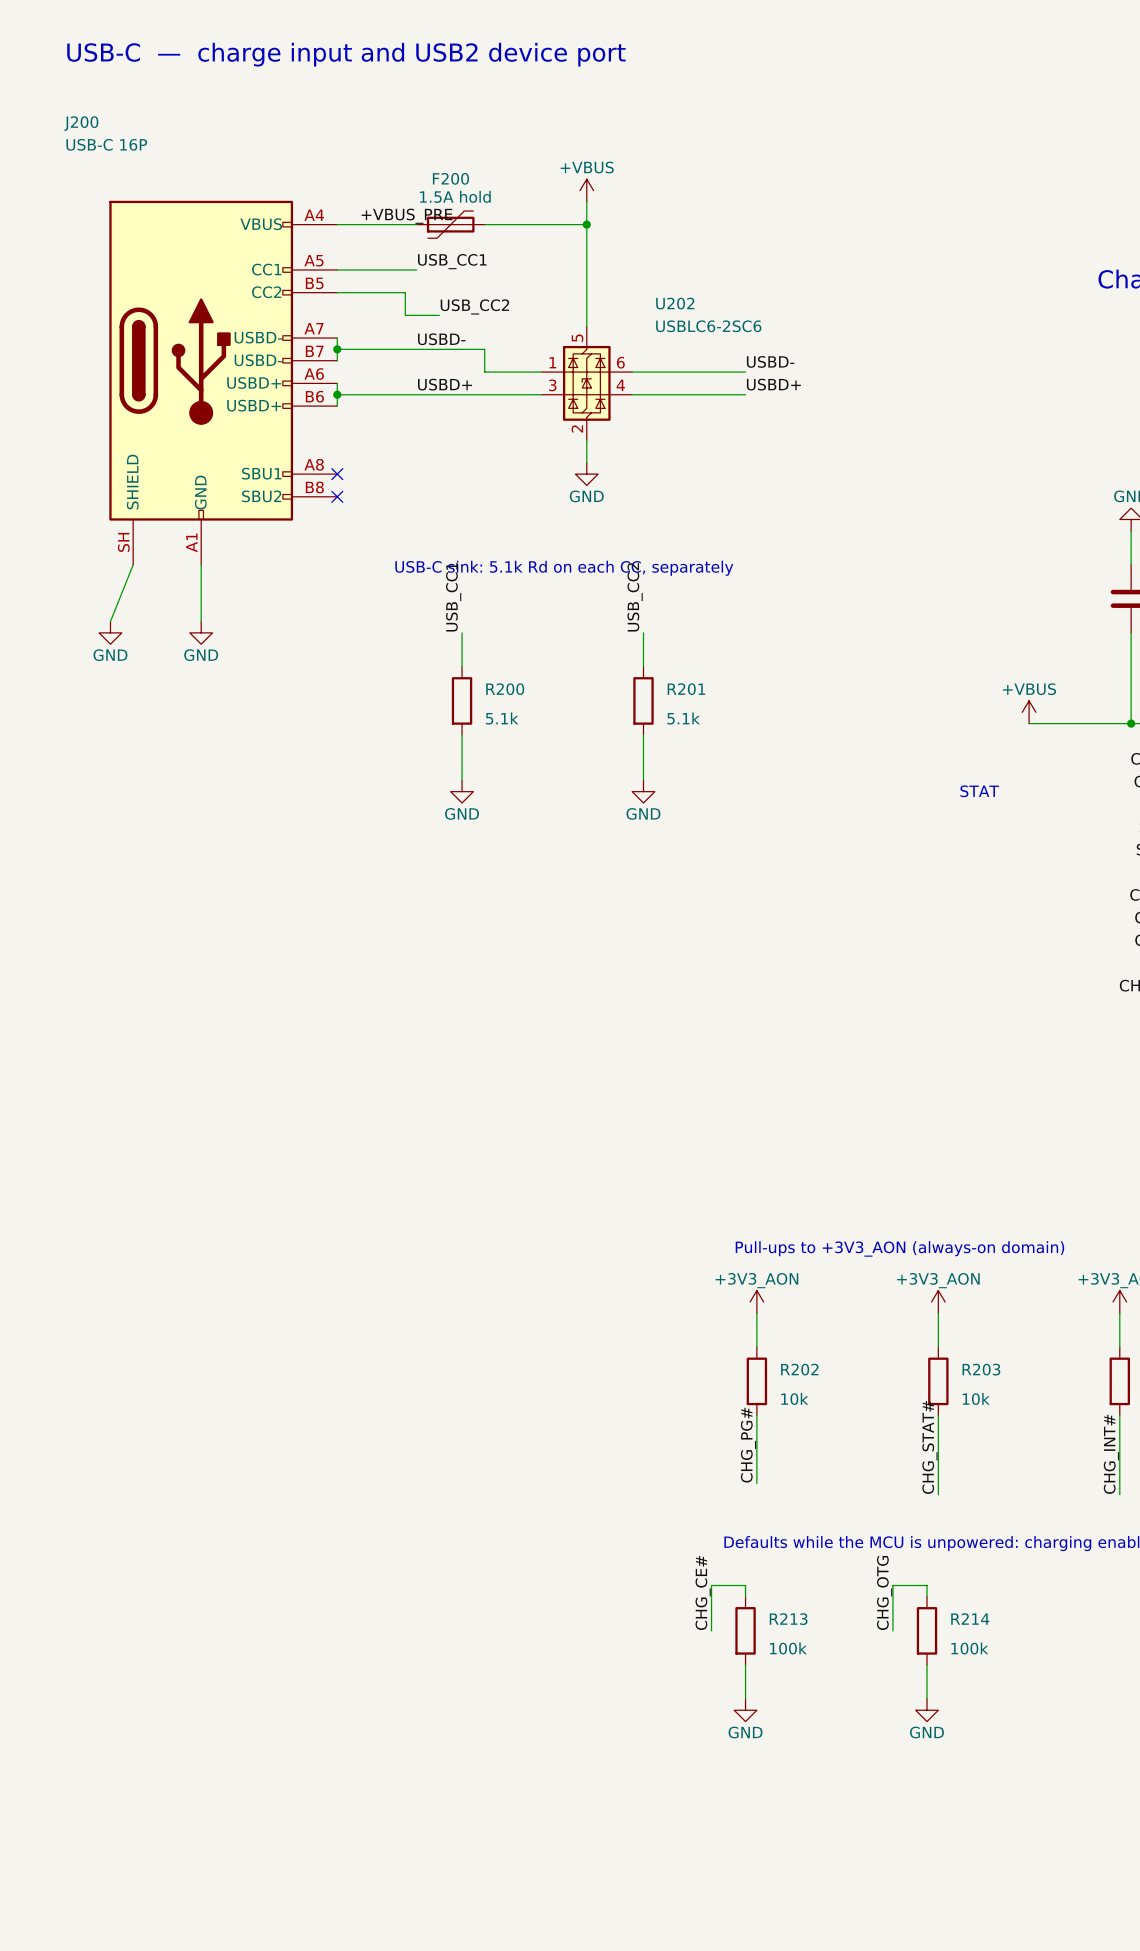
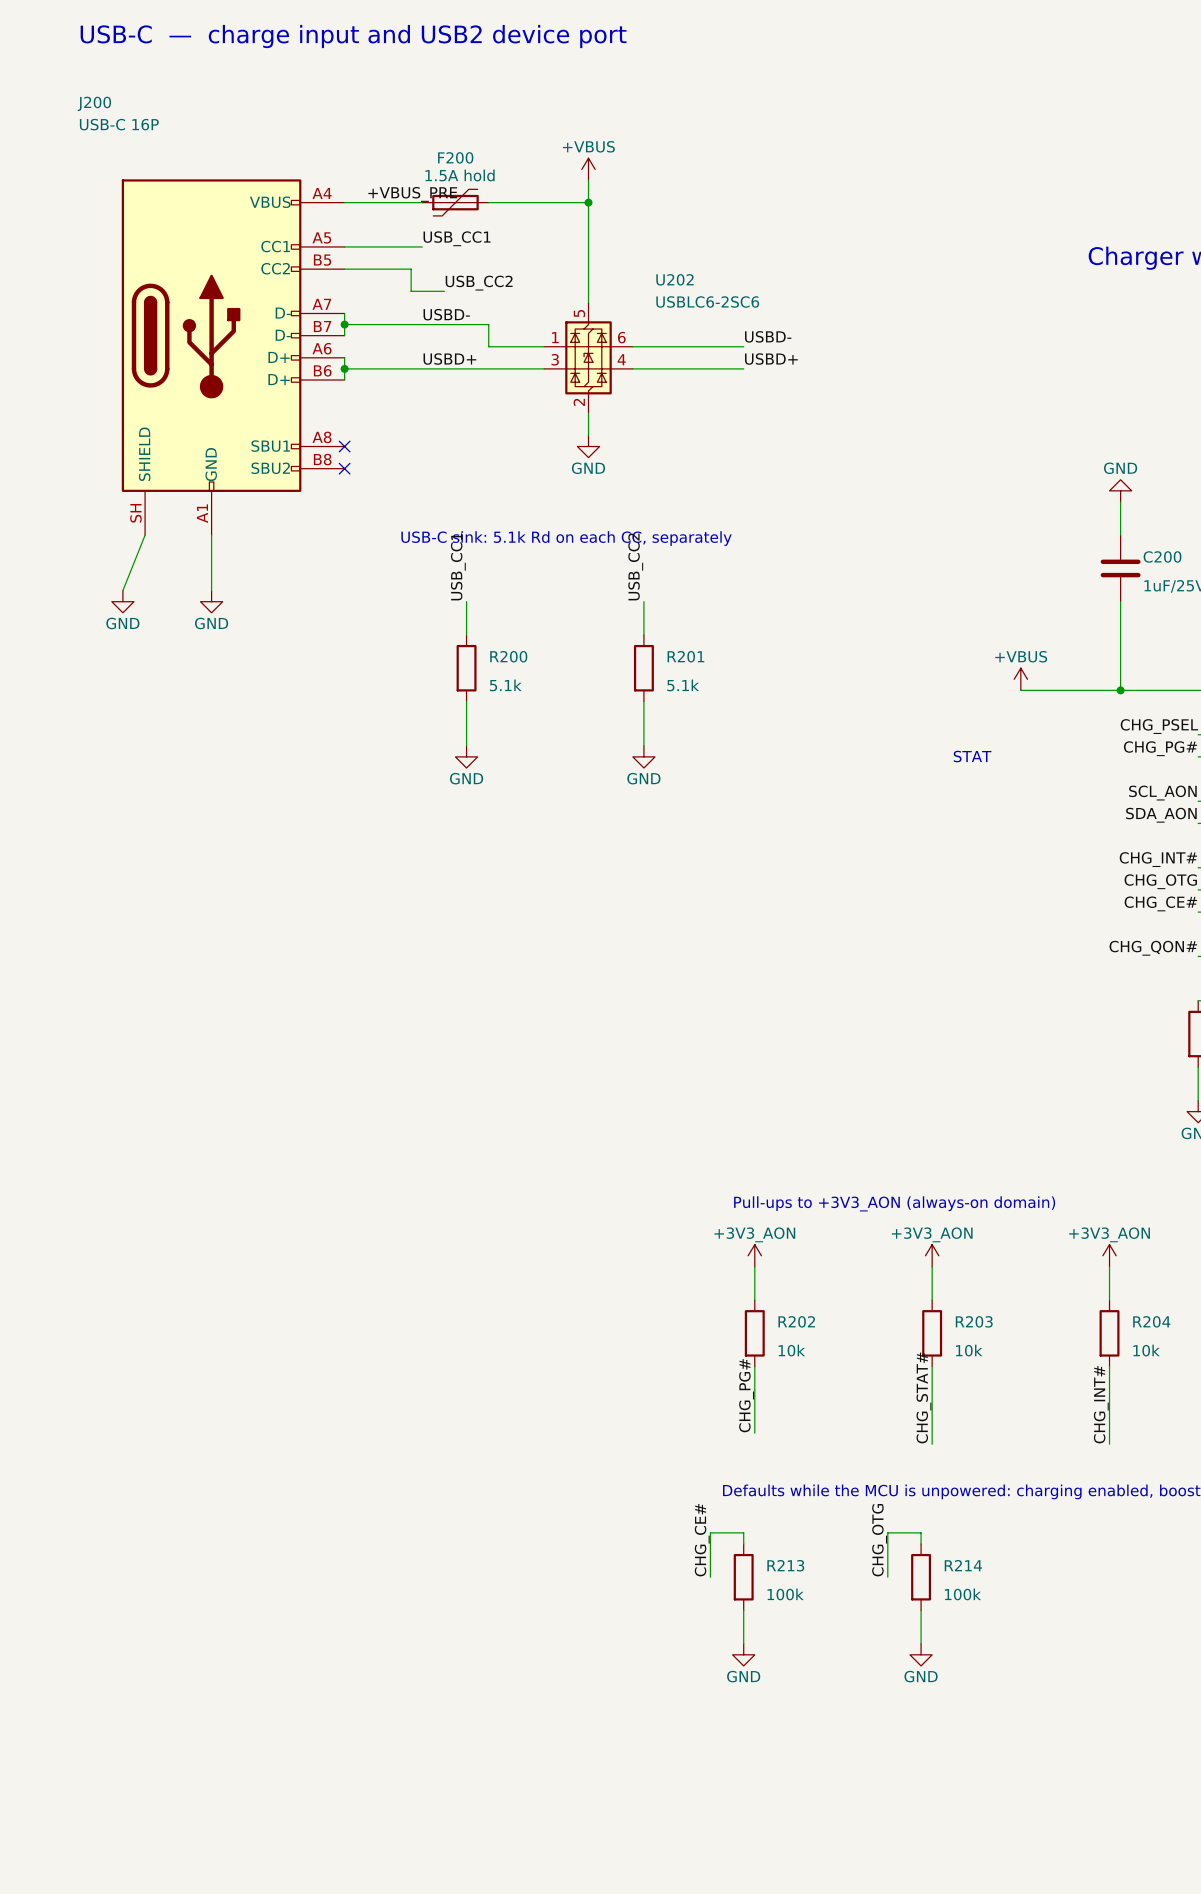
J200 pin name: USBD- (258, 337) -> D- (283, 313)
J200 pin name: USBD- (258, 360) -> D- (283, 335)
J200 pin name: USBD+ (254, 382) -> D+ (279, 357)
J200 pin name: USBD+ (254, 405) -> D+ (279, 379)

